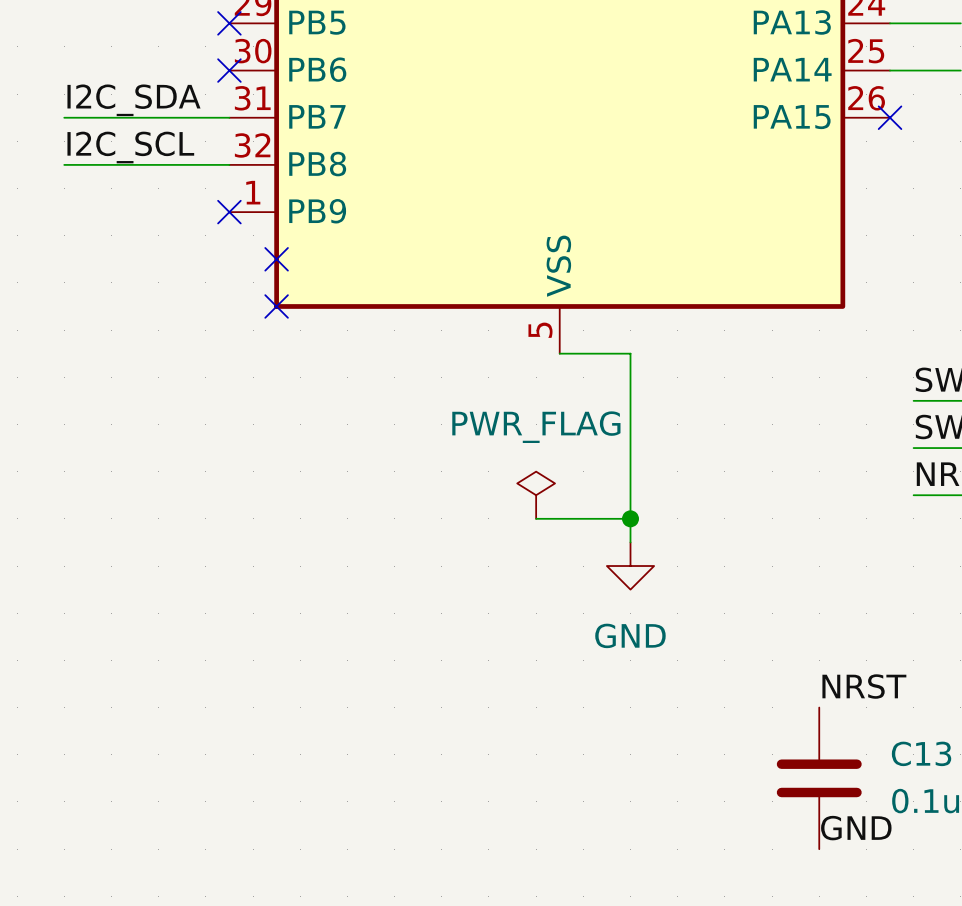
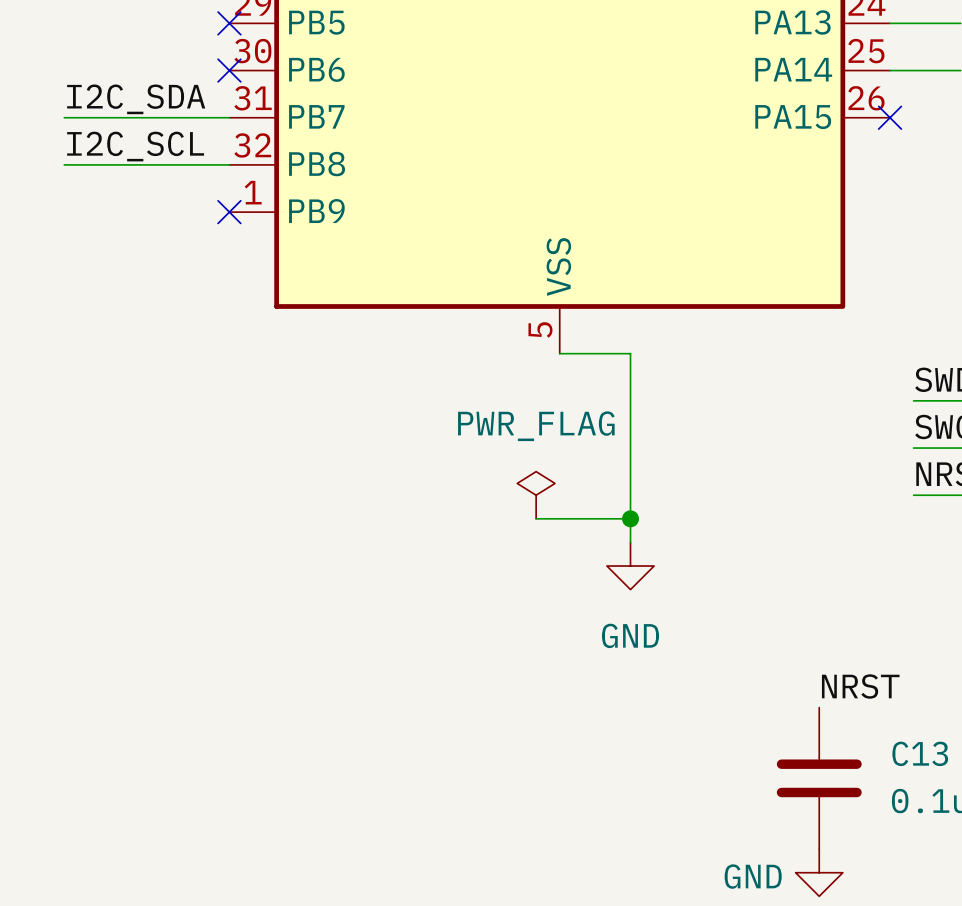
no-connect mark: (276, 259) -> none
no-connect mark: (276, 306) -> none
label: GND (856, 828) -> none
power symbol: none -> GND (819, 872)

